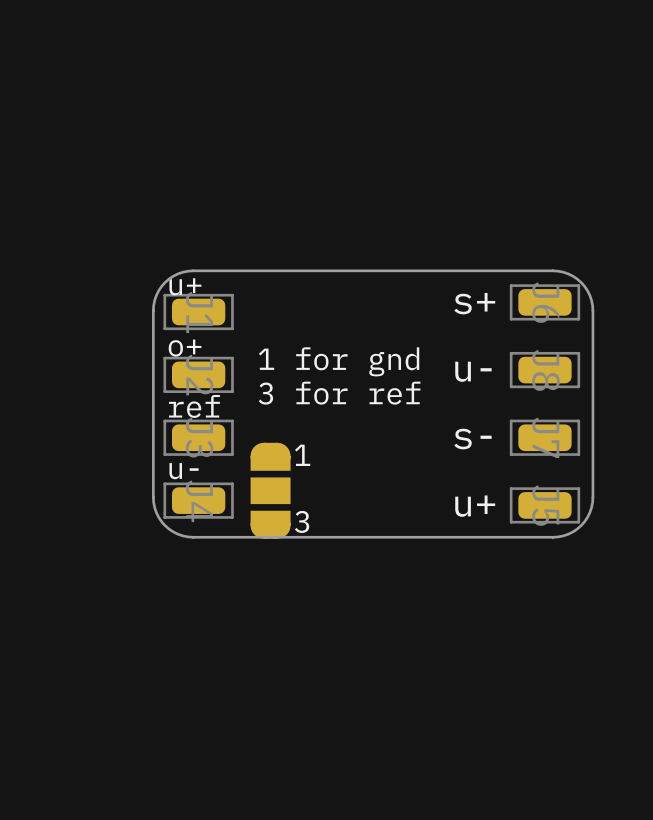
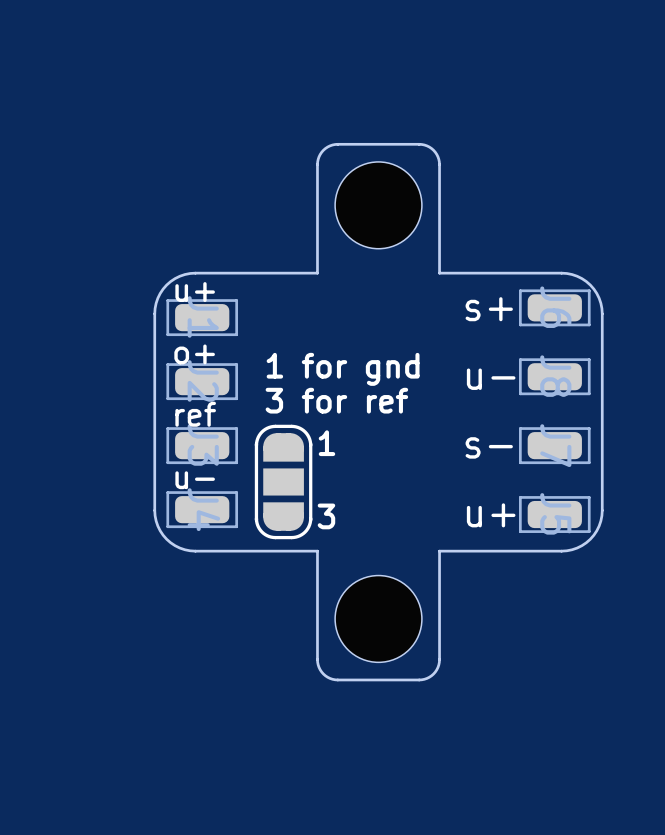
part: none -> (378, 205)
board edge: (552, 270) (193, 270) (173, 276) (158, 290) (153, 310) (153, 497) (158, 517) (173, 531) (193, 537) (552, 537) (572, 531) (587, 517) (592, 502) (592, 305) (589, 295) (581, 282) (568, 273) (552, 270) -> (419, 144) (431, 148) (436, 154) (439, 161) (439, 273) (566, 273) (586, 281) (599, 298) (602, 313) (601, 515) (596, 530) (590, 539) (572, 549) (439, 551) (439, 659) (435, 672) (429, 677) (421, 679) (335, 679) (323, 674) (317, 662) (317, 551) (190, 550) (170, 542) (157, 526) (154, 510) (155, 308) (163, 289) (170, 281) (184, 274) (317, 273) (317, 164) (321, 152) (327, 147) (335, 144) (419, 144)
part footprint: [250, 442, 291, 539] -> [254, 424, 313, 540]
part: none -> (378, 618)

